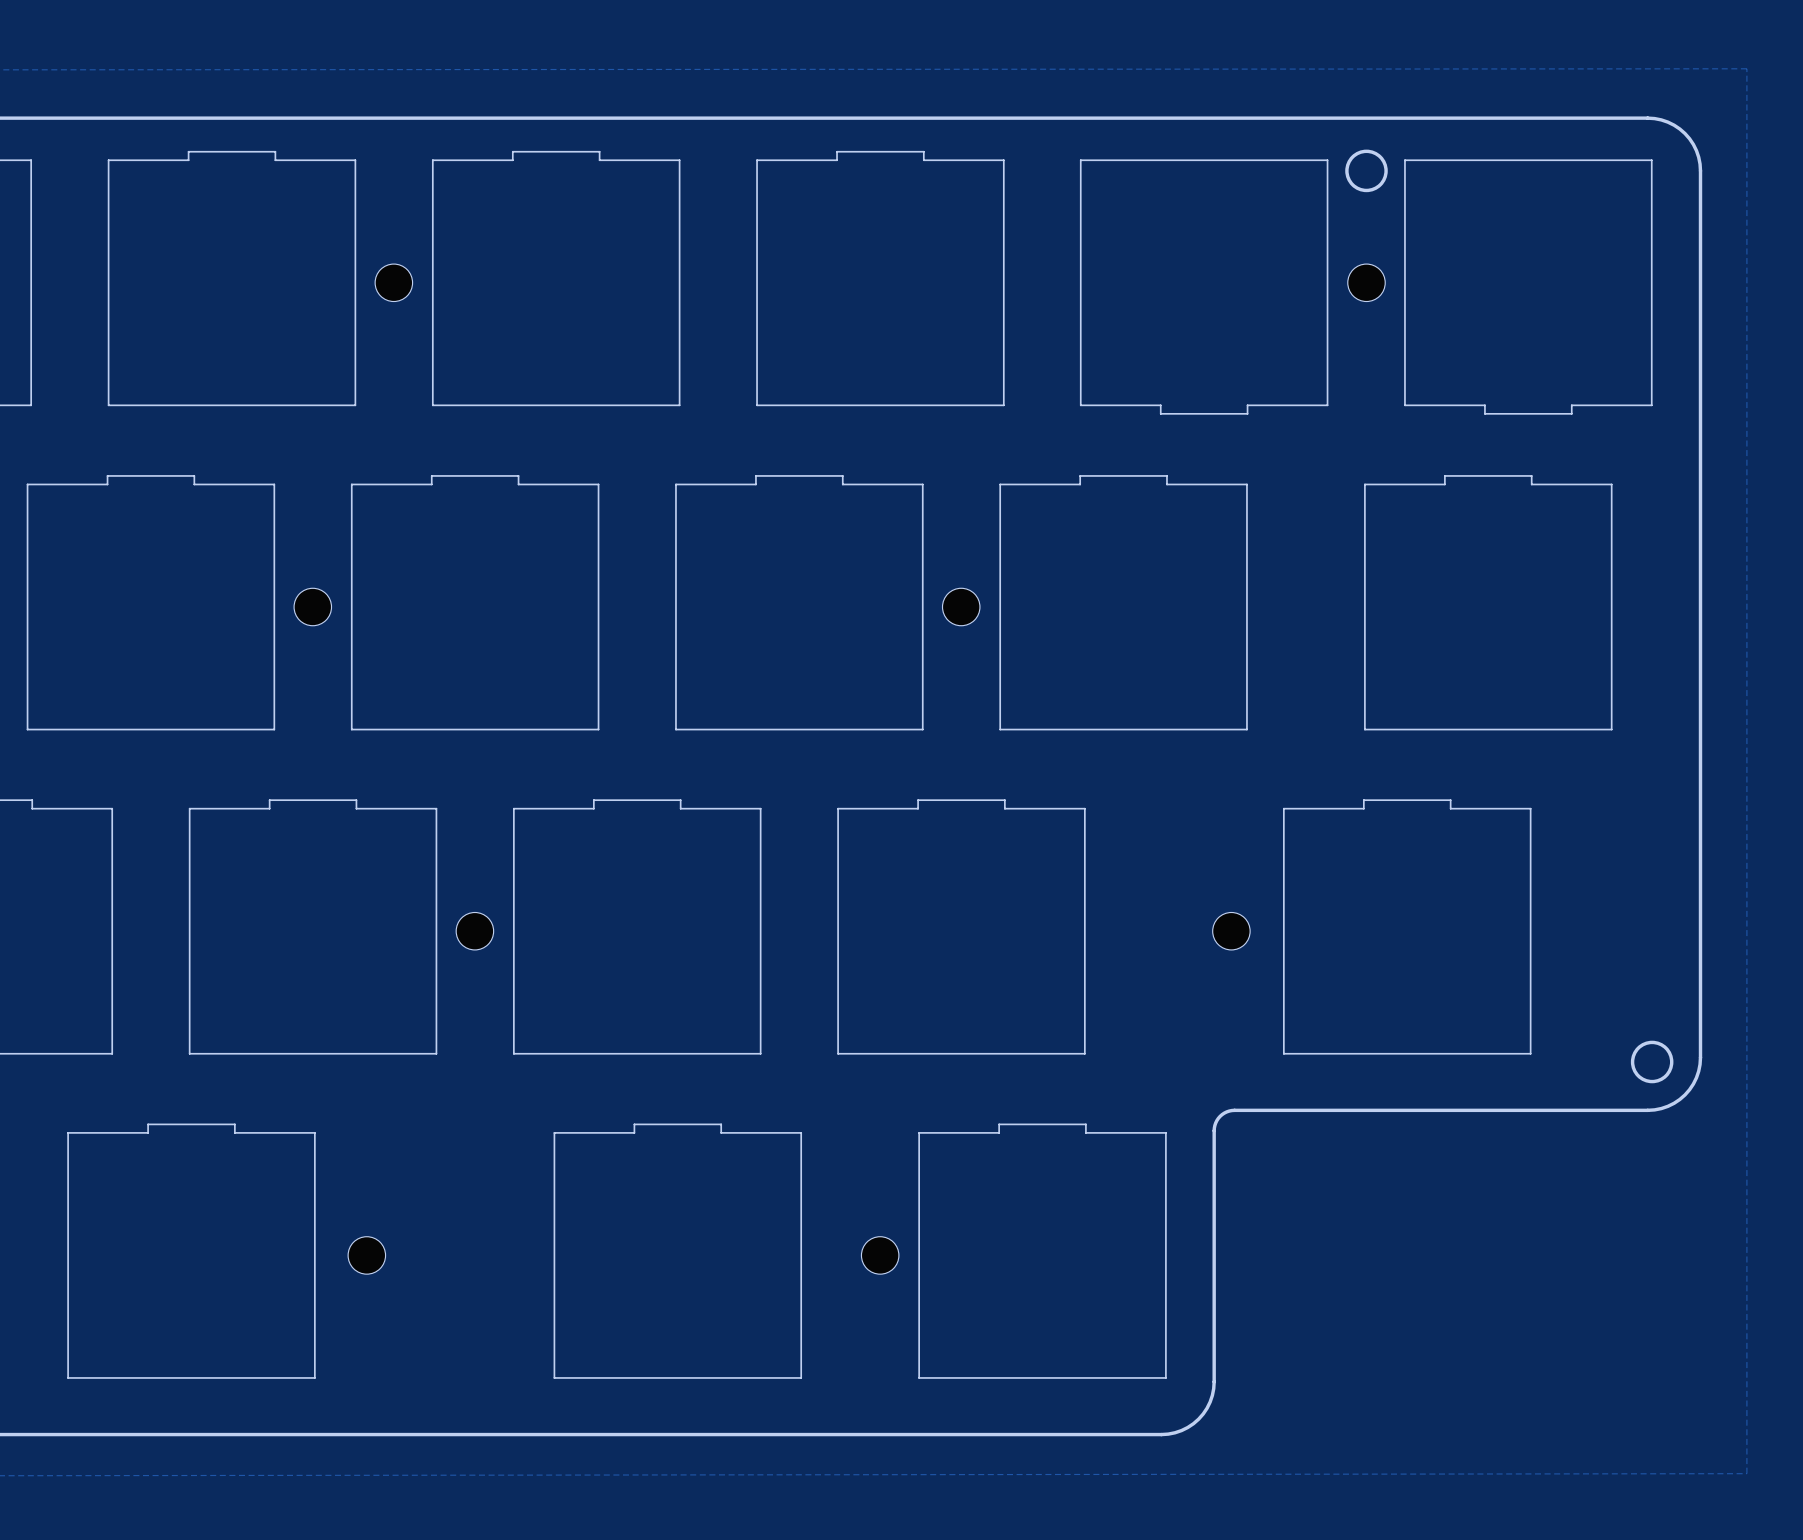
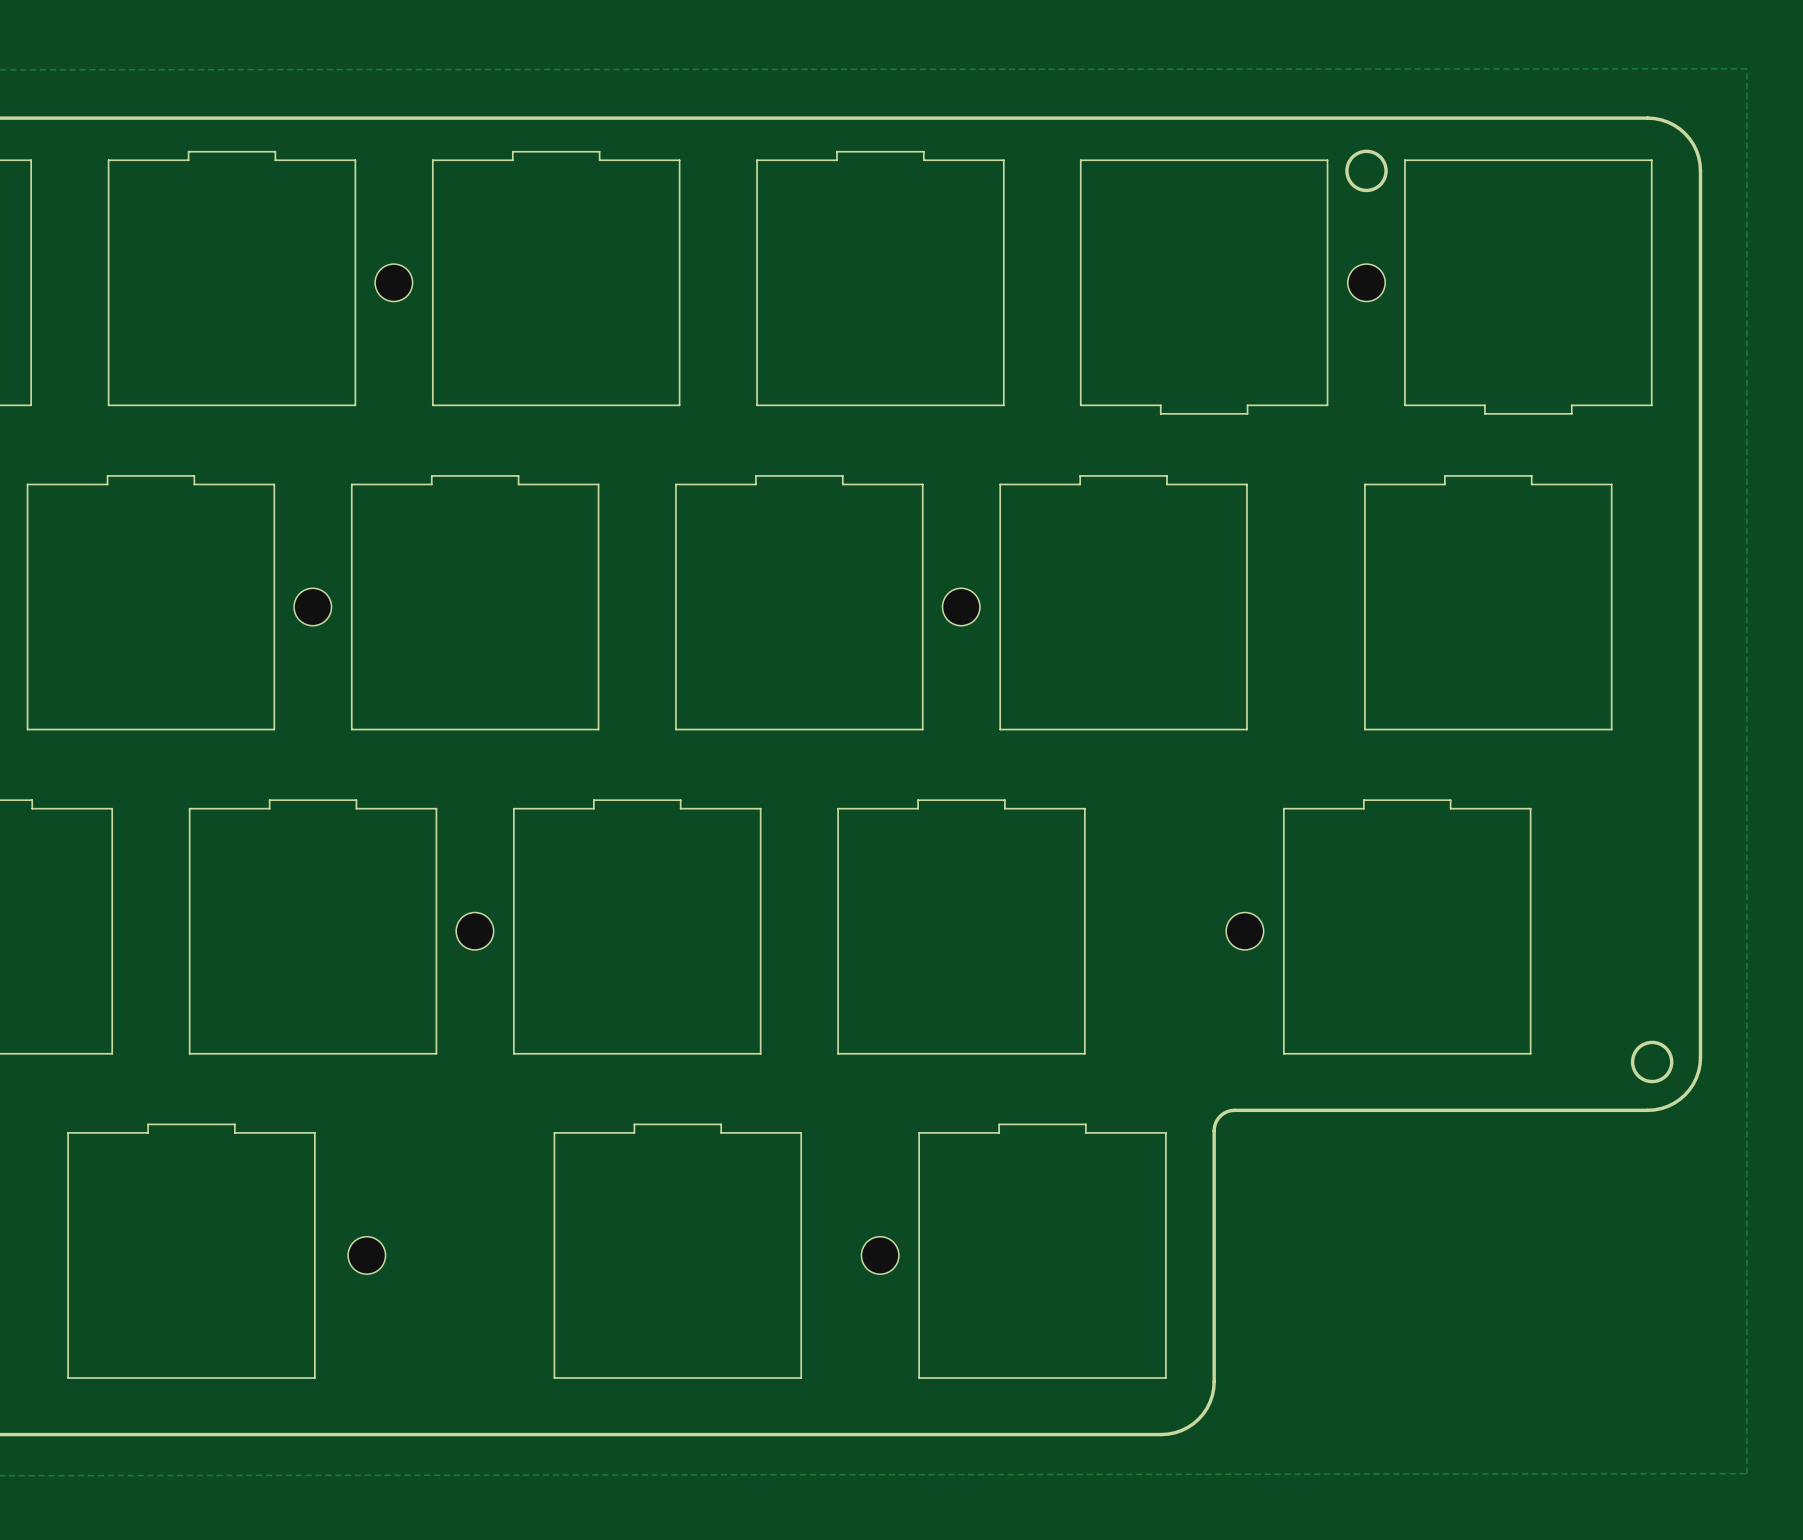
part position: (1231, 931) -> (1244, 931)

